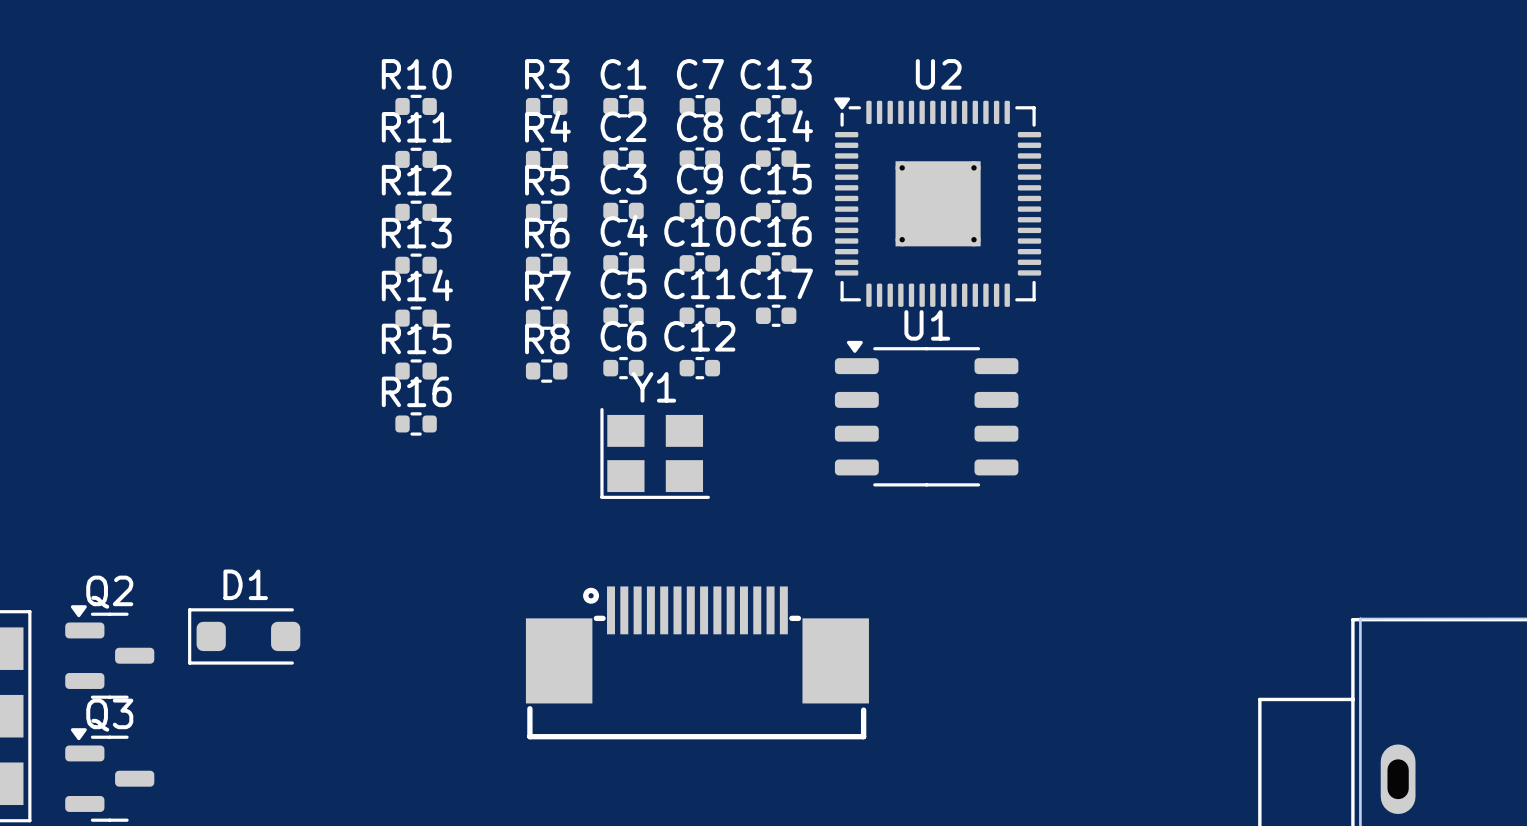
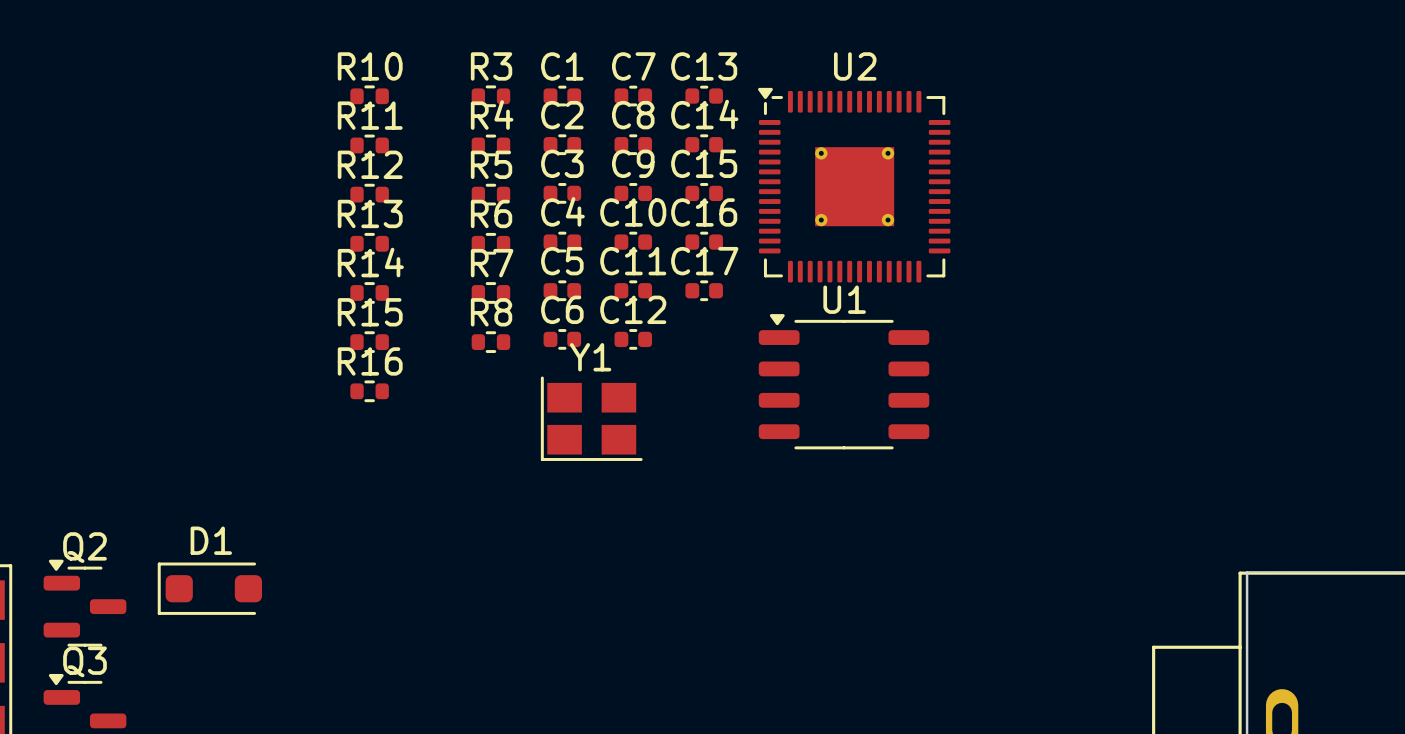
part: (697, 662) -> none

